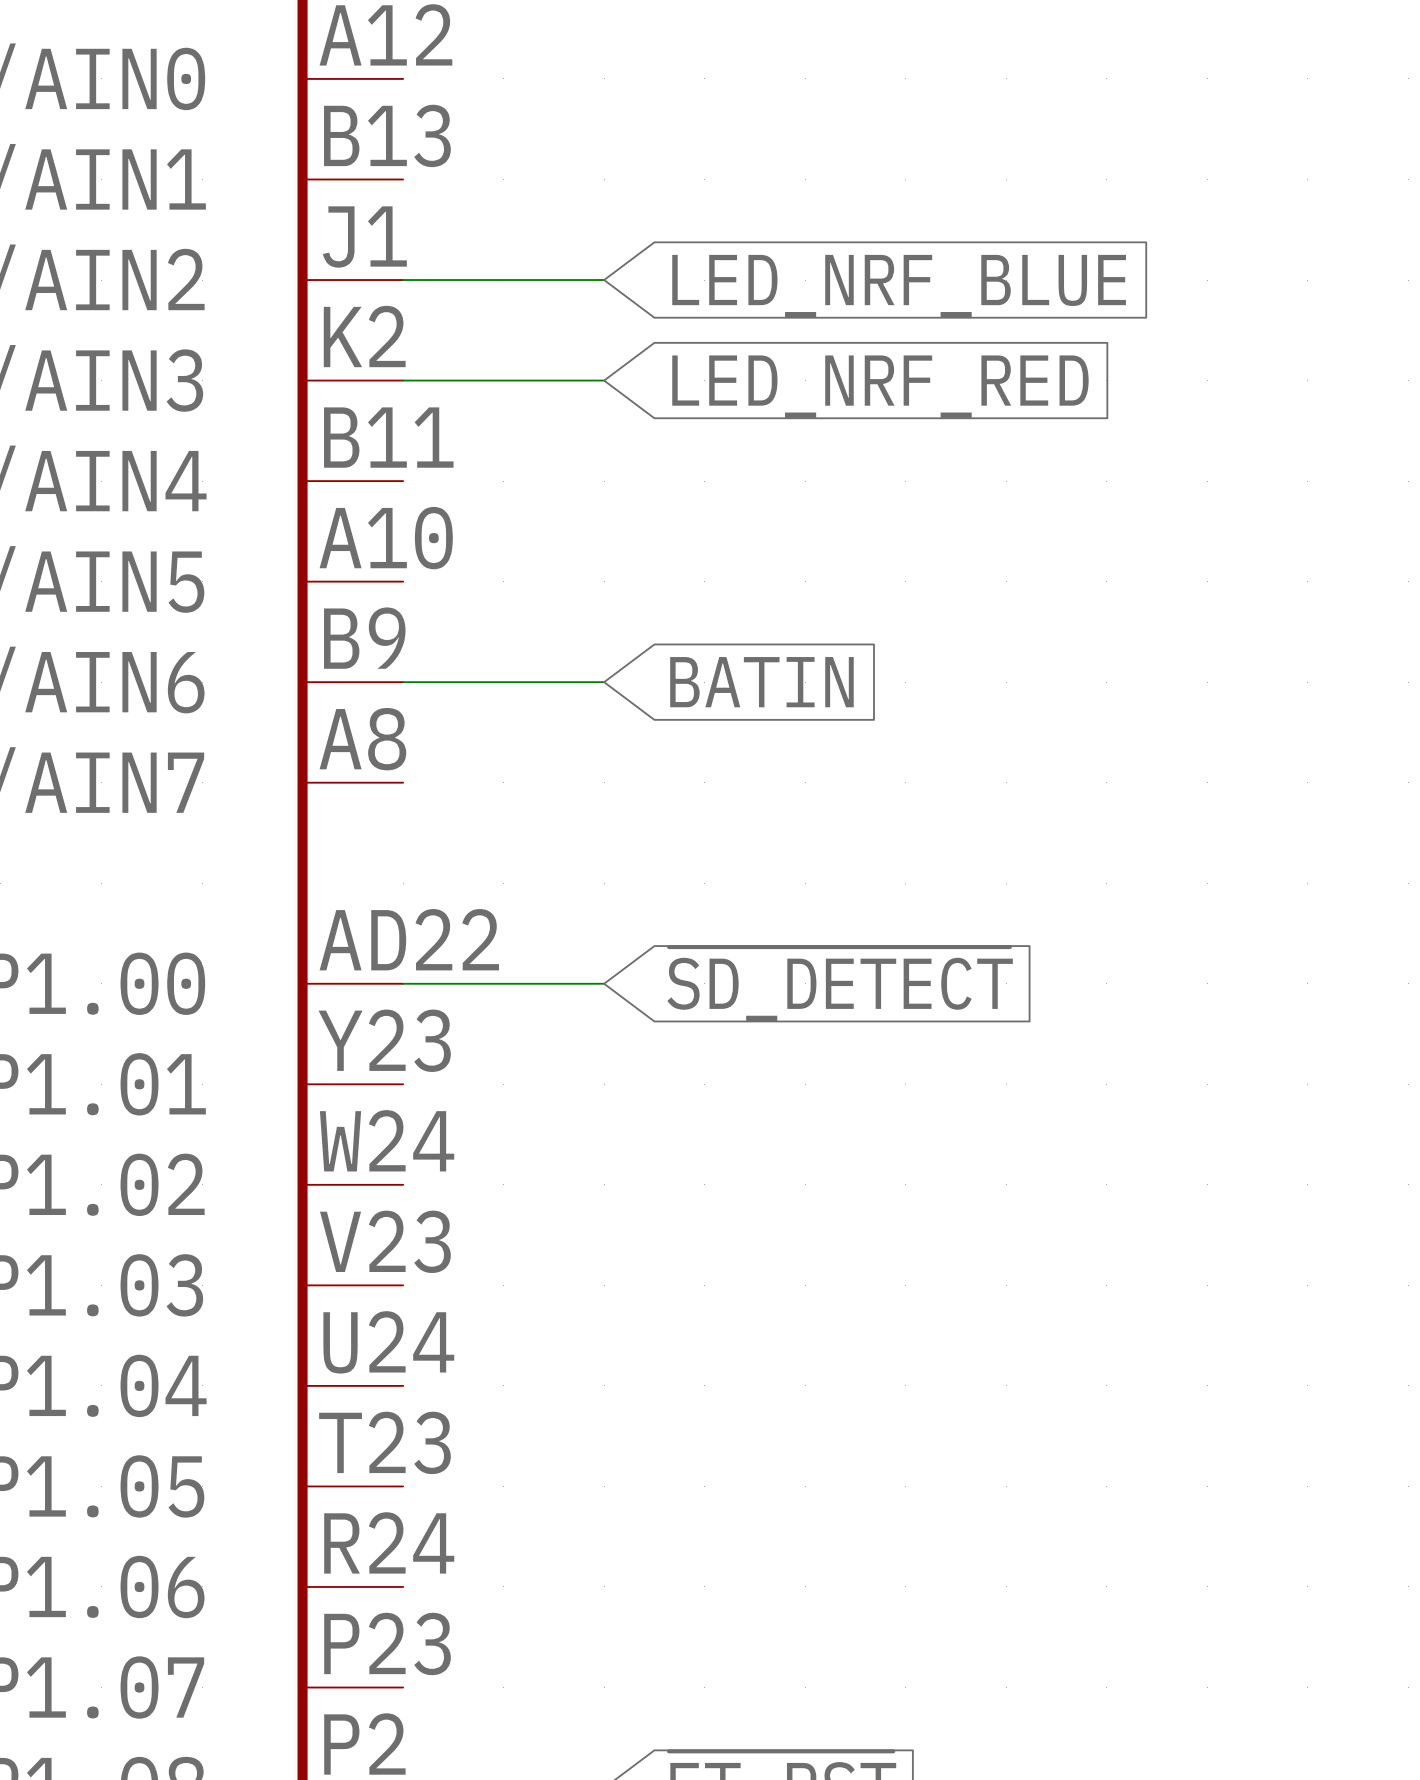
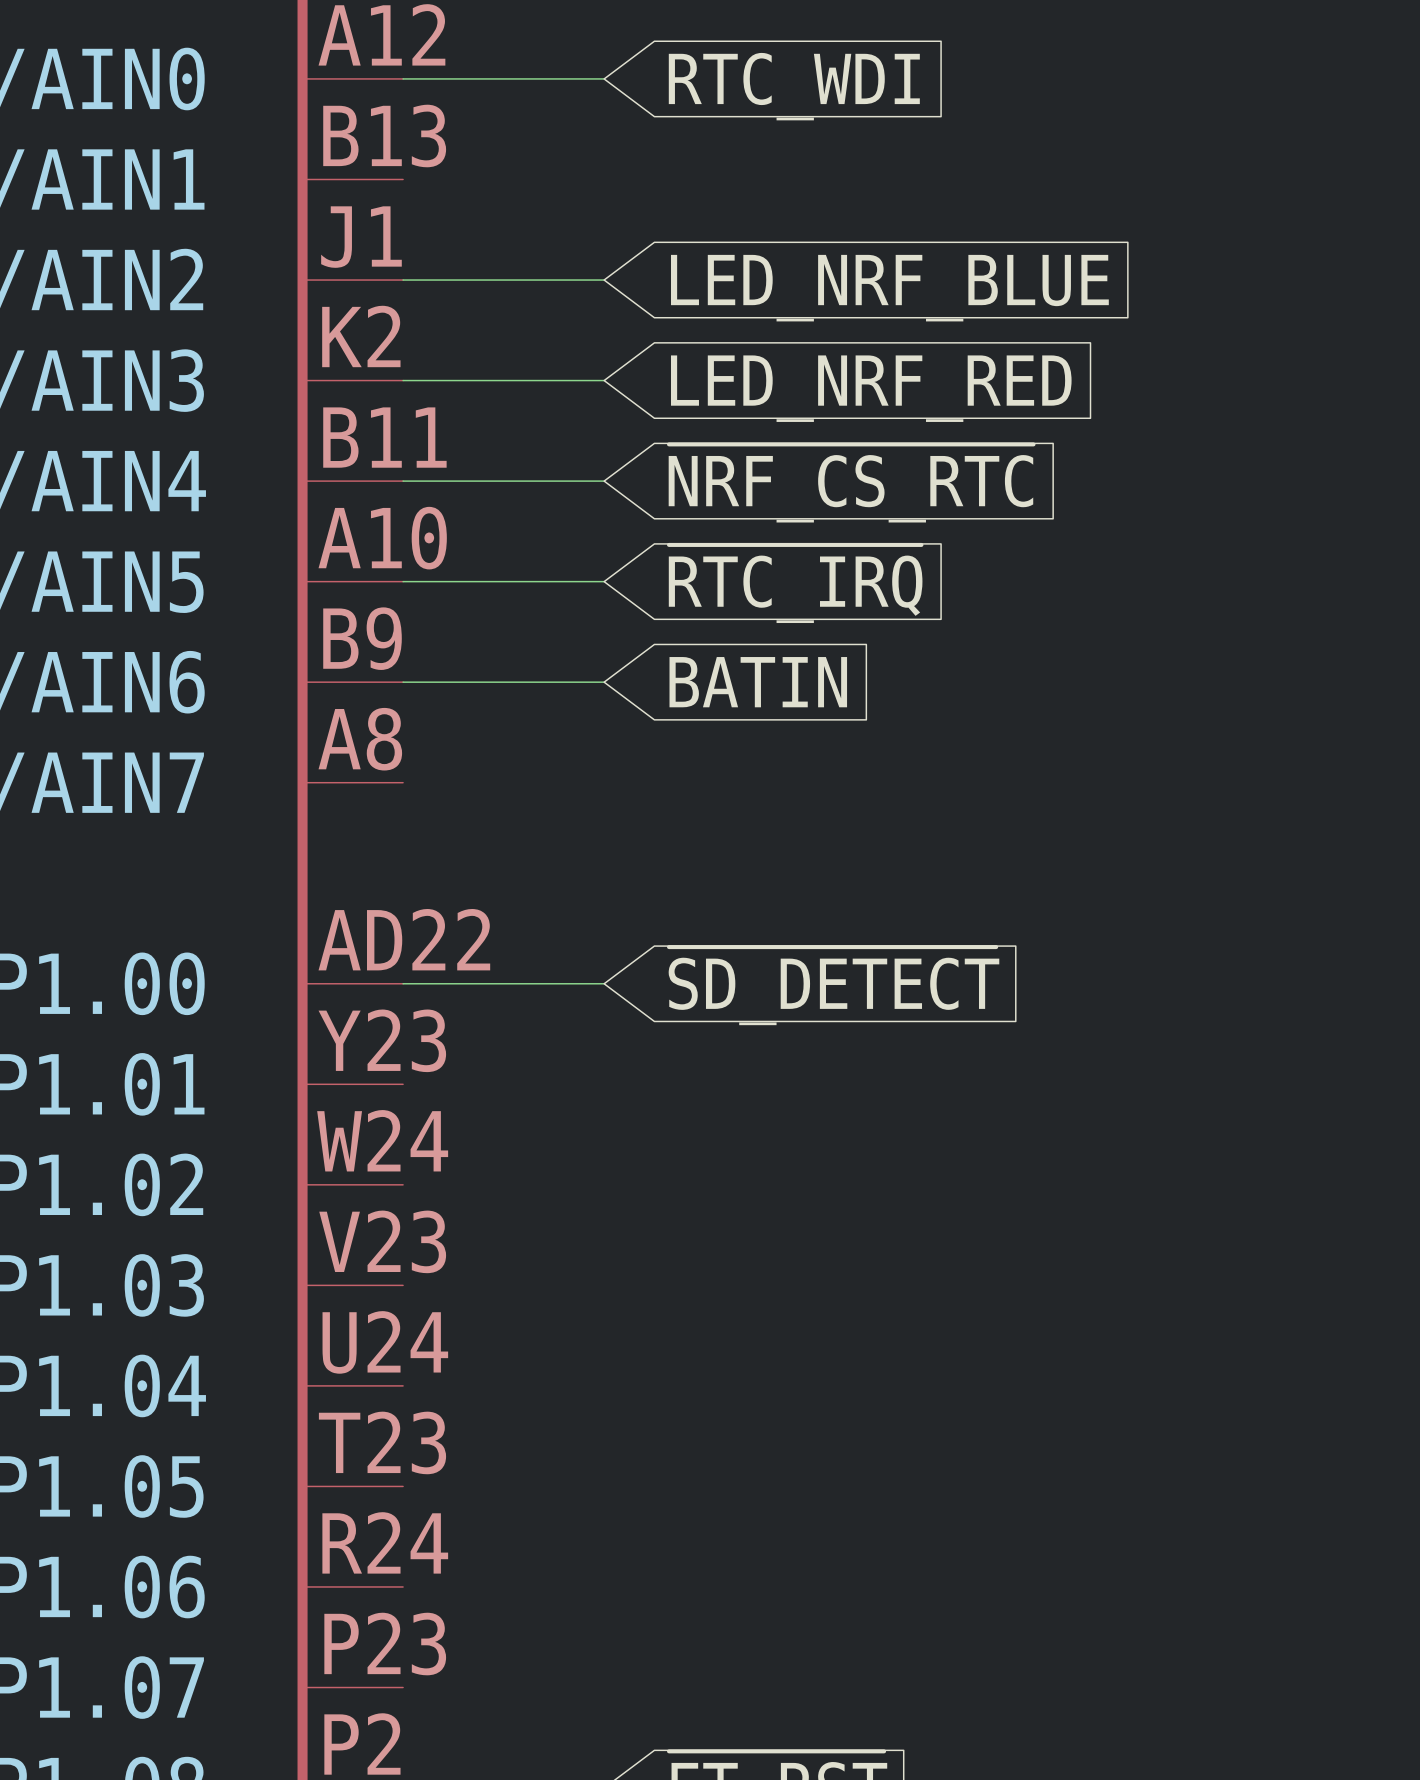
wire: none -> (403, 78) (604, 78)
global label: none -> RTC_WDI (794, 86)
wire: none -> (403, 481) (604, 481)
global label: none -> ~{NRF_CS_RTC} (851, 483)
wire: none -> (403, 581) (604, 581)
global label: none -> ~{RTC_IRQ} (795, 583)

